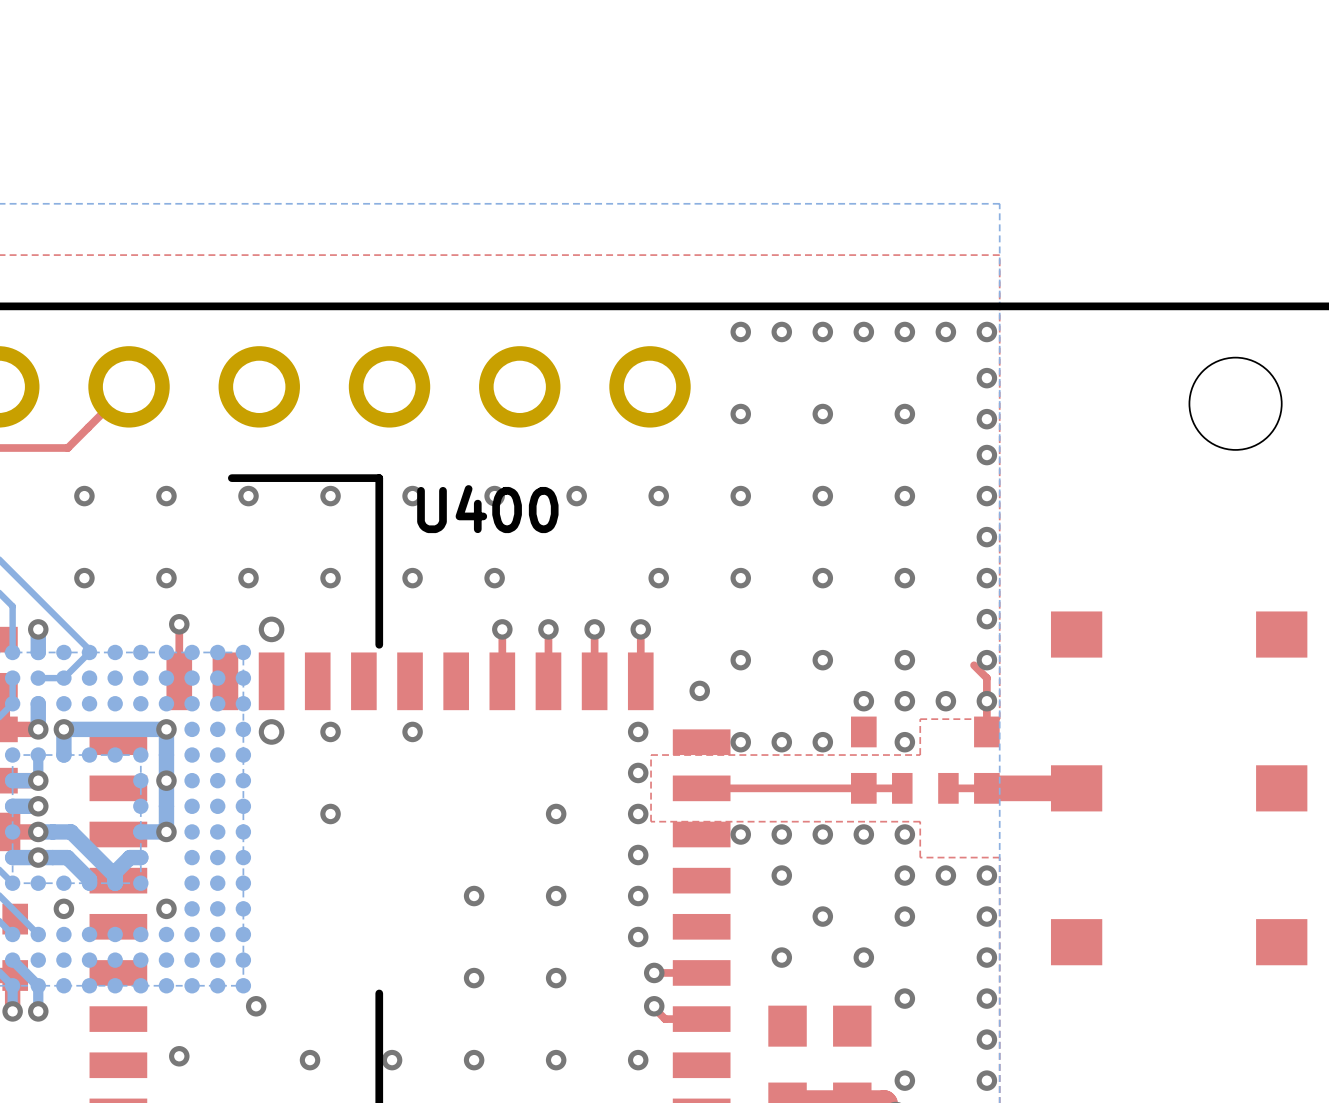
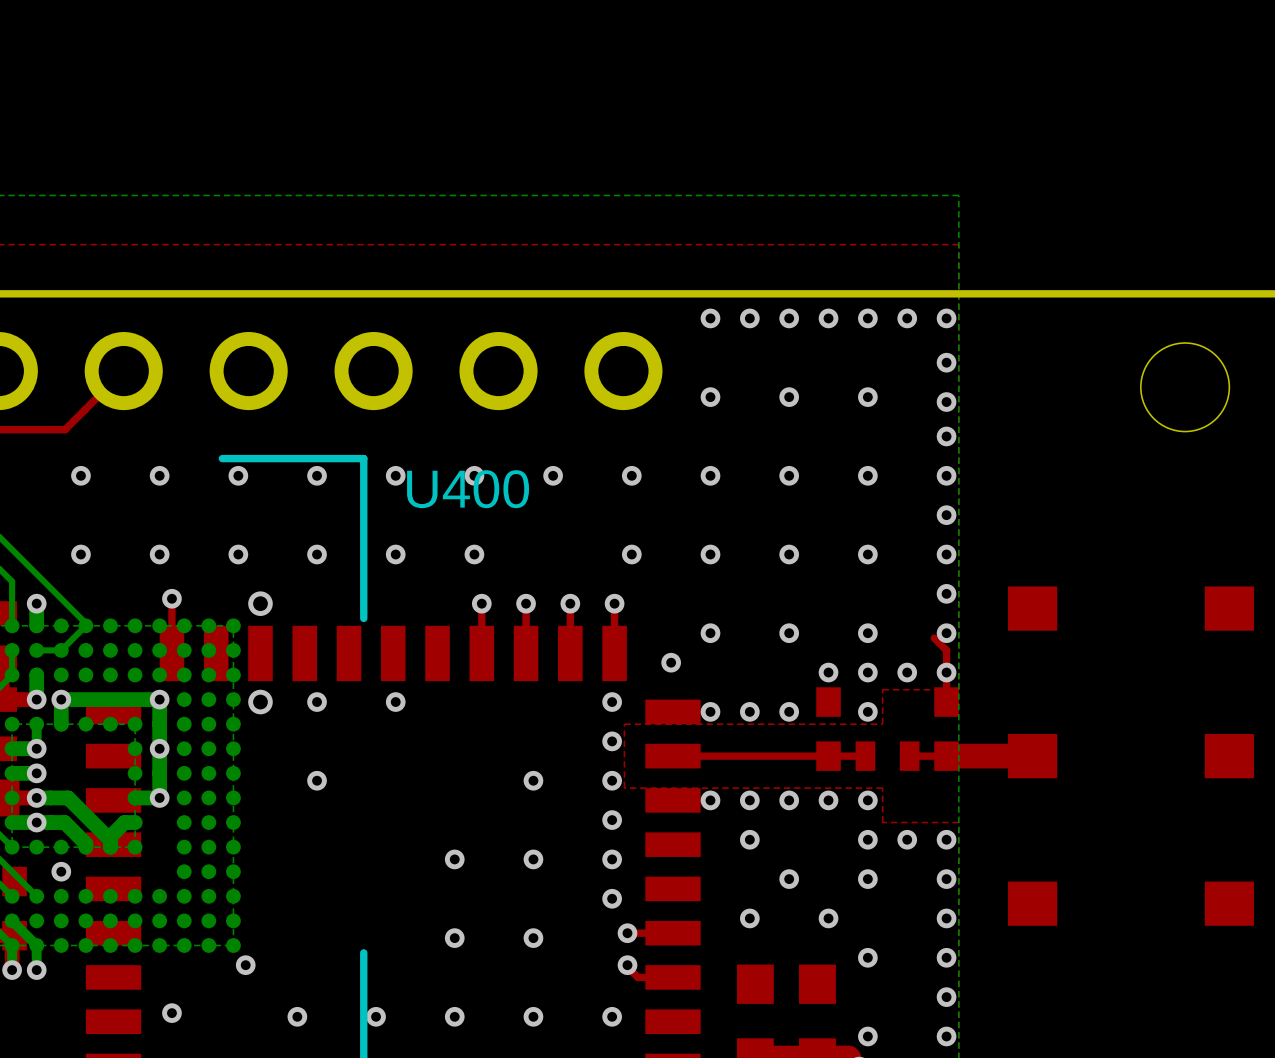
via: (166, 908) -> none

